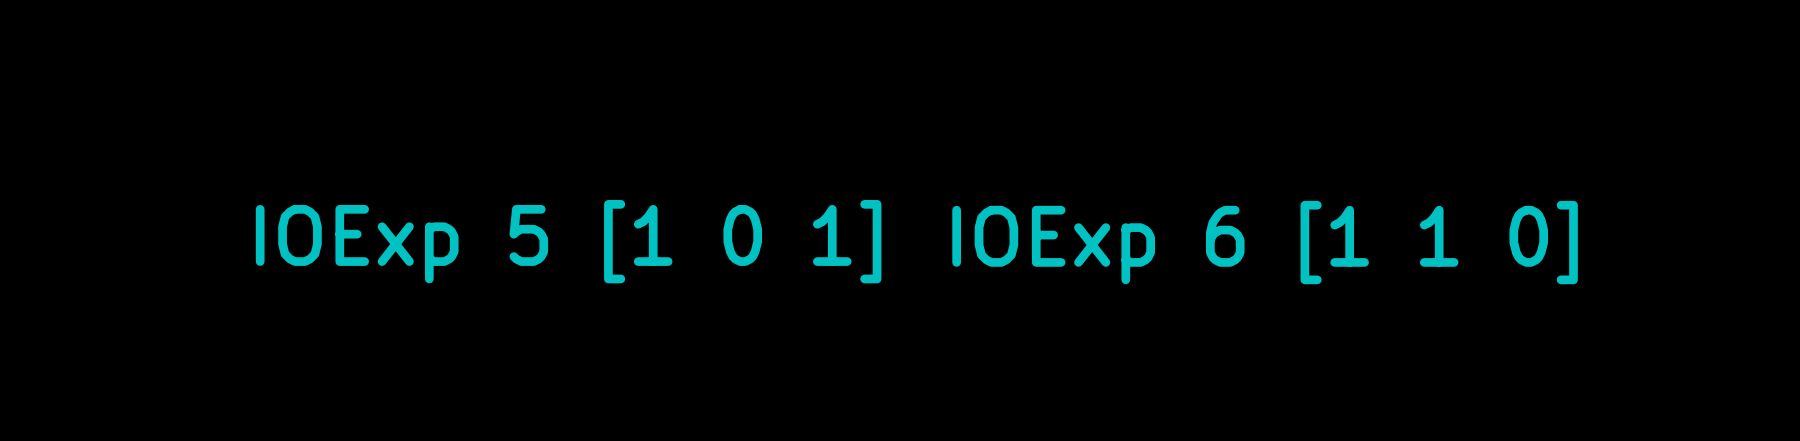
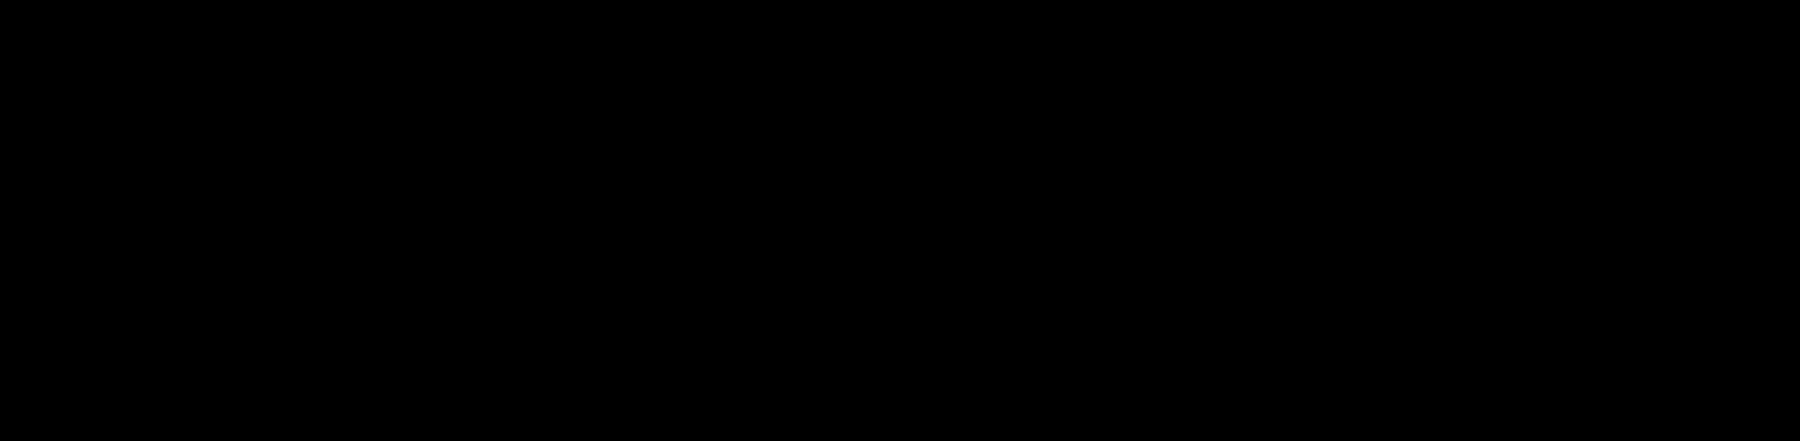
text: IOExp 5 [1 0 1] (568, 241) -> none
text: IOExp 6 [1 1 0] (1265, 242) -> none

